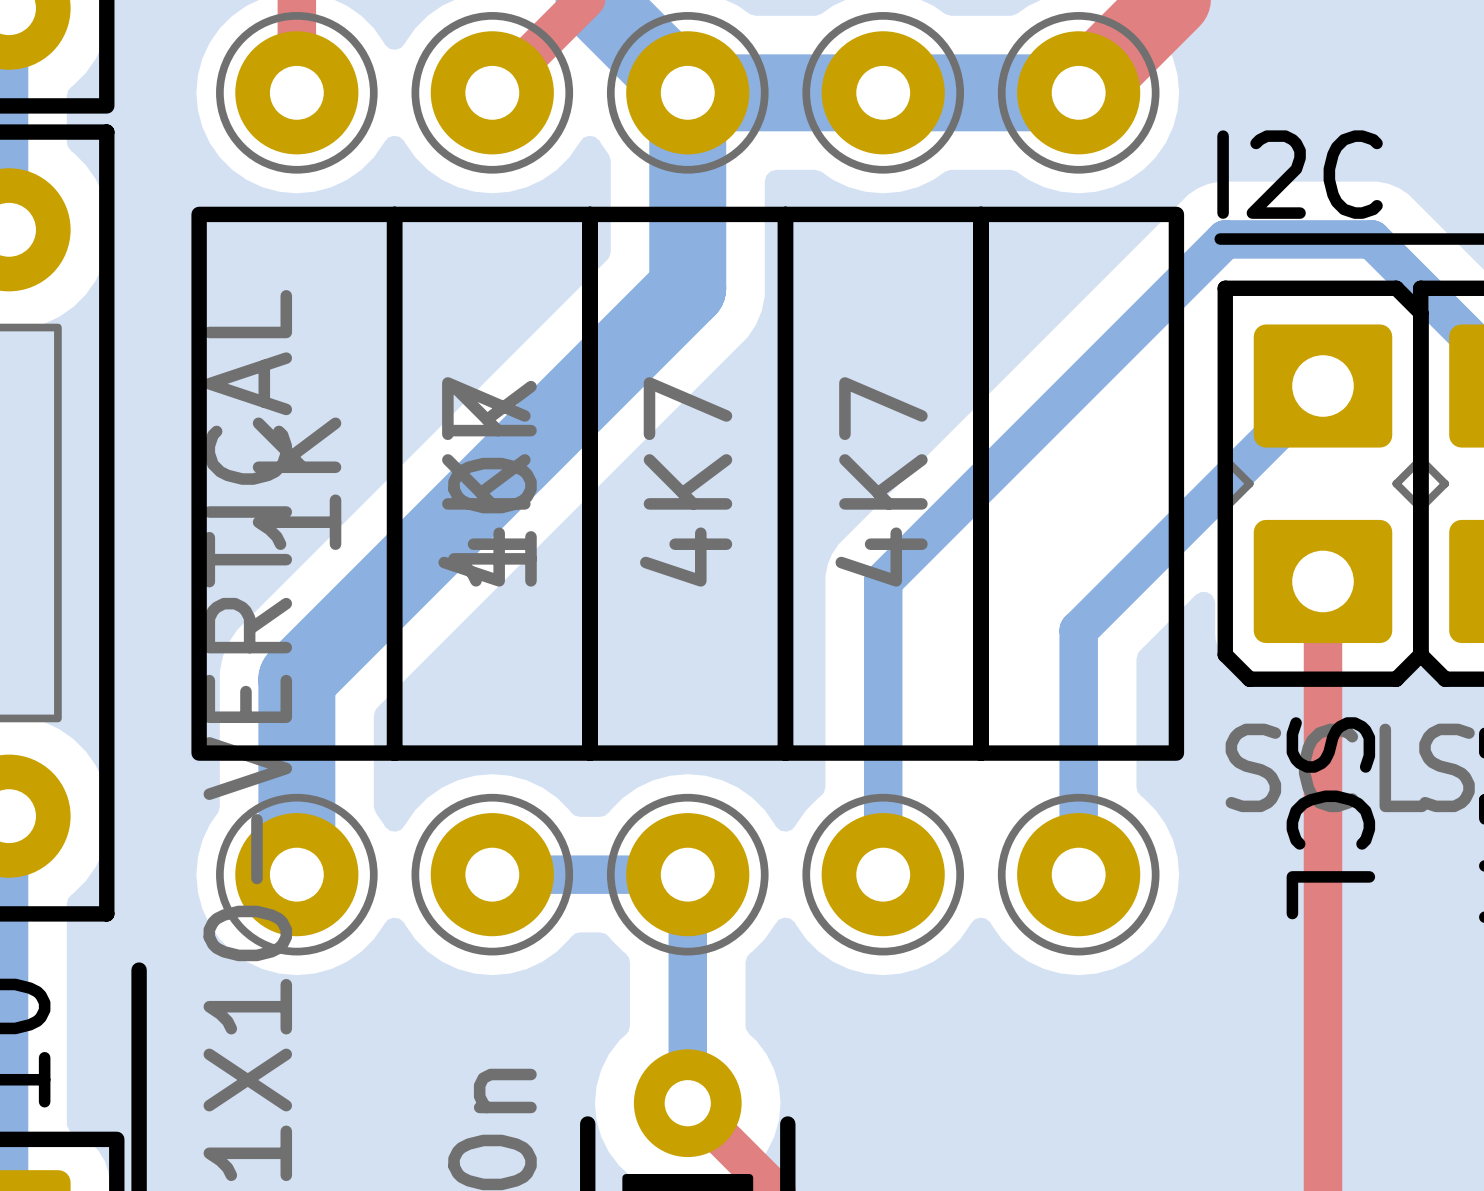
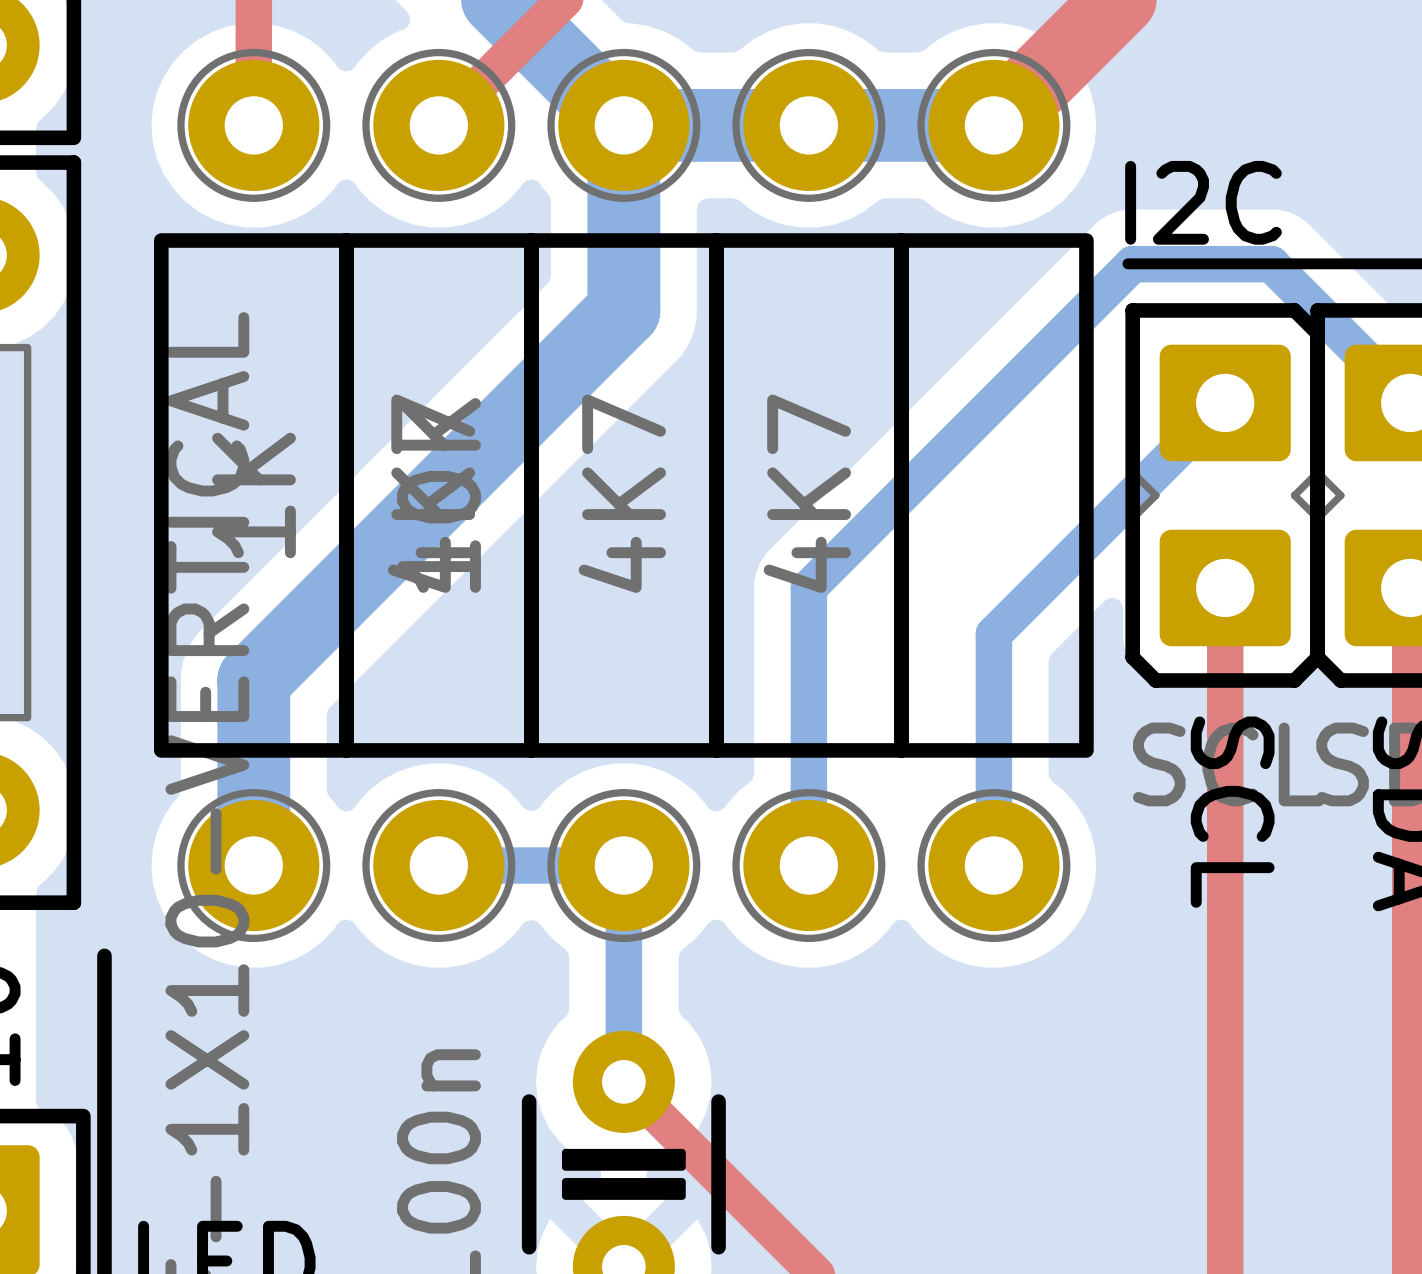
part footprint: [191, 12, 403, 956] -> [154, 48, 354, 943]
part footprint: [386, 12, 598, 956] -> [339, 48, 539, 943]
part footprint: [582, 12, 794, 956] -> [524, 48, 724, 943]
part footprint: [777, 12, 989, 956] -> [709, 48, 909, 943]
part footprint: [973, 12, 1185, 956] -> [894, 48, 1094, 943]

